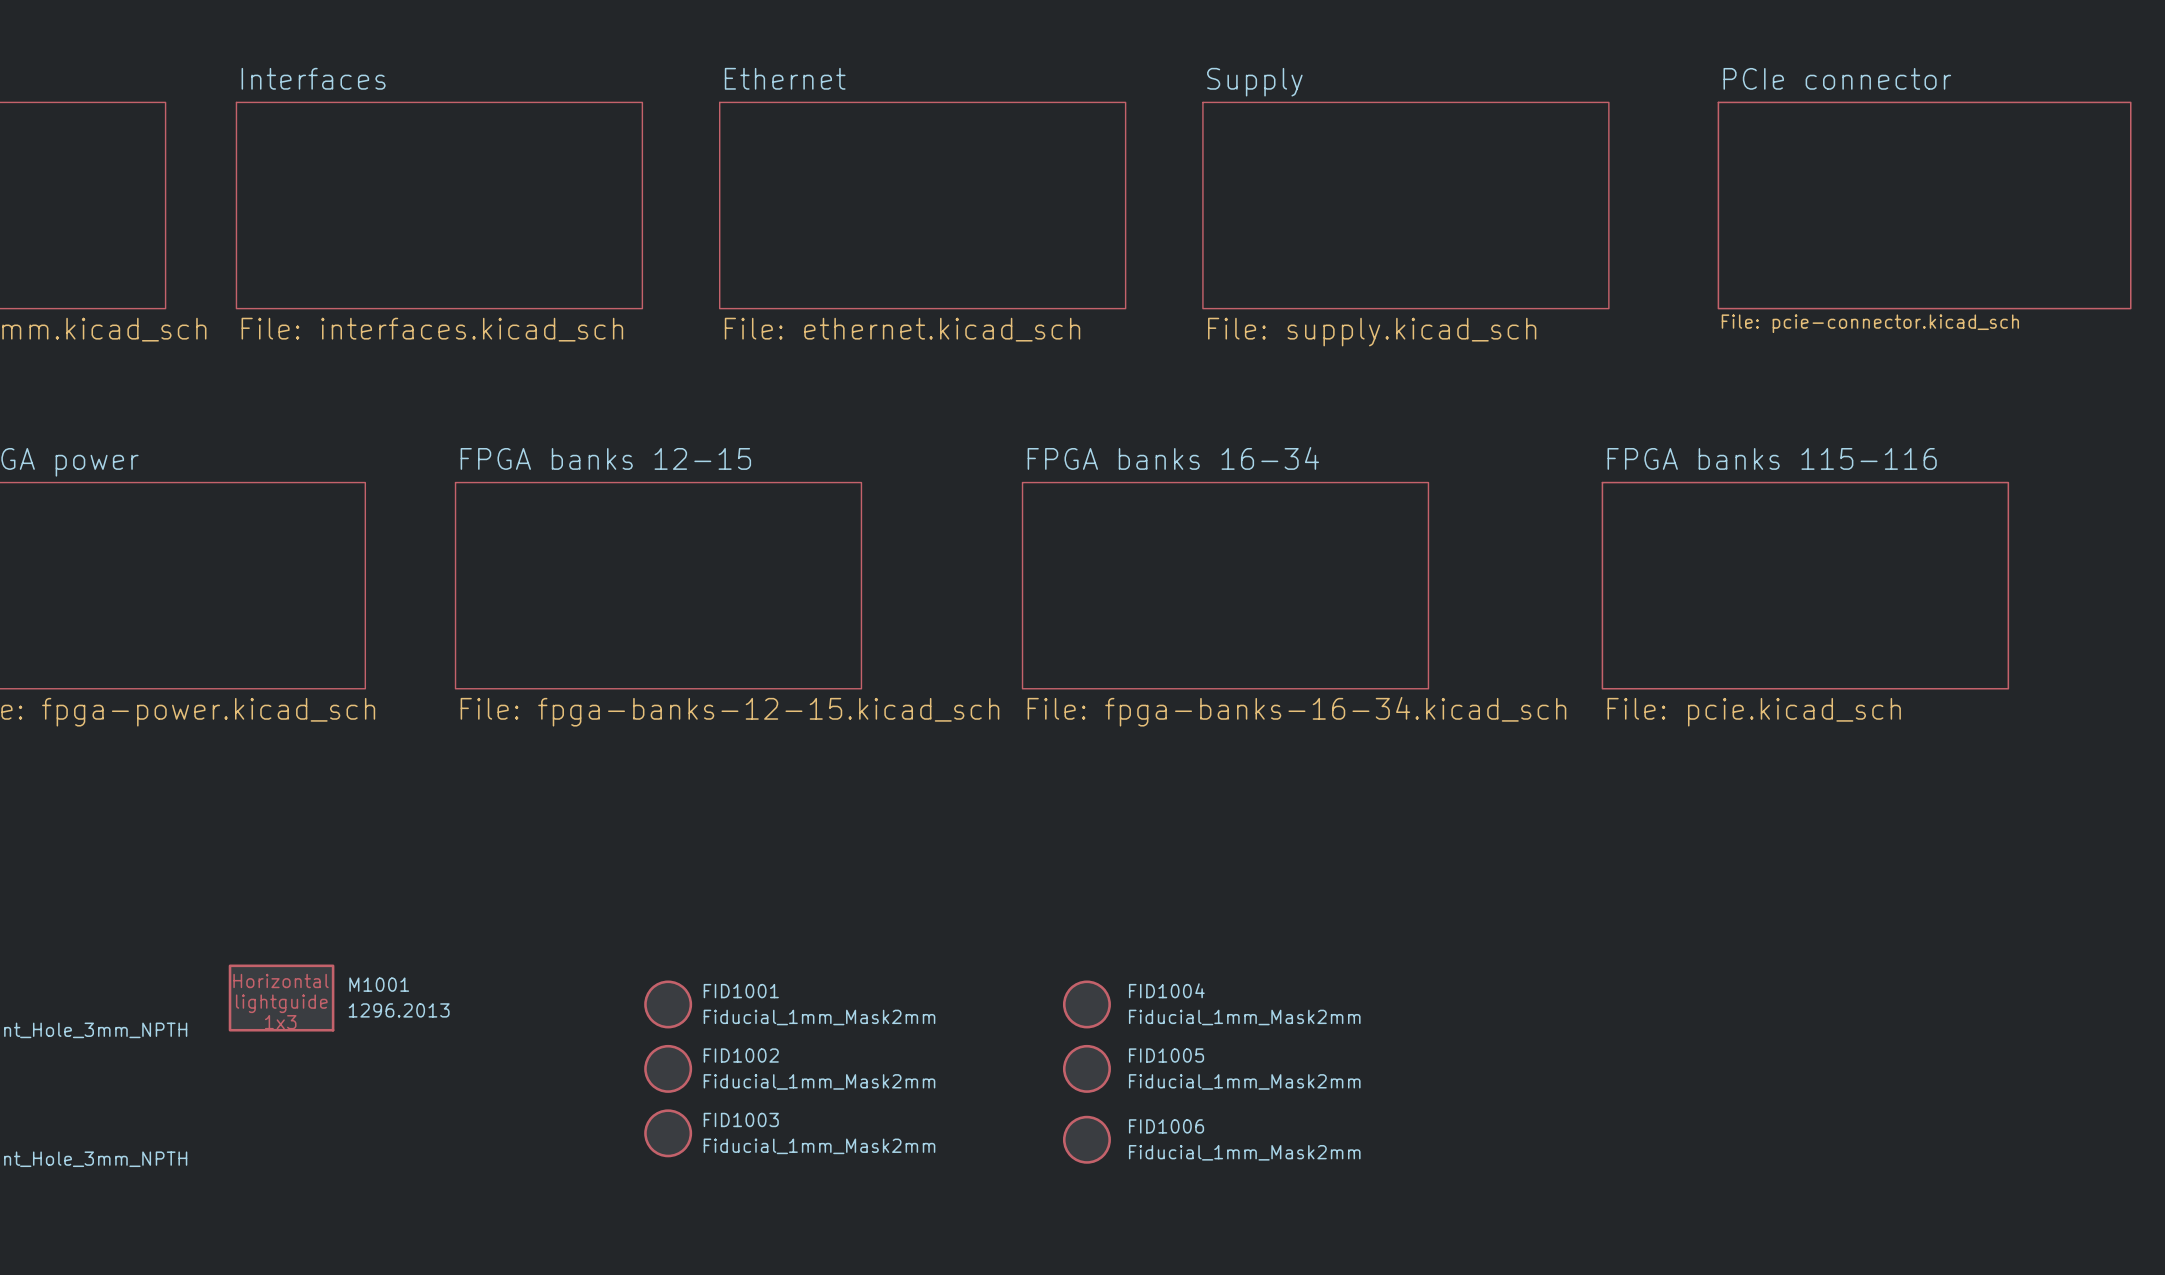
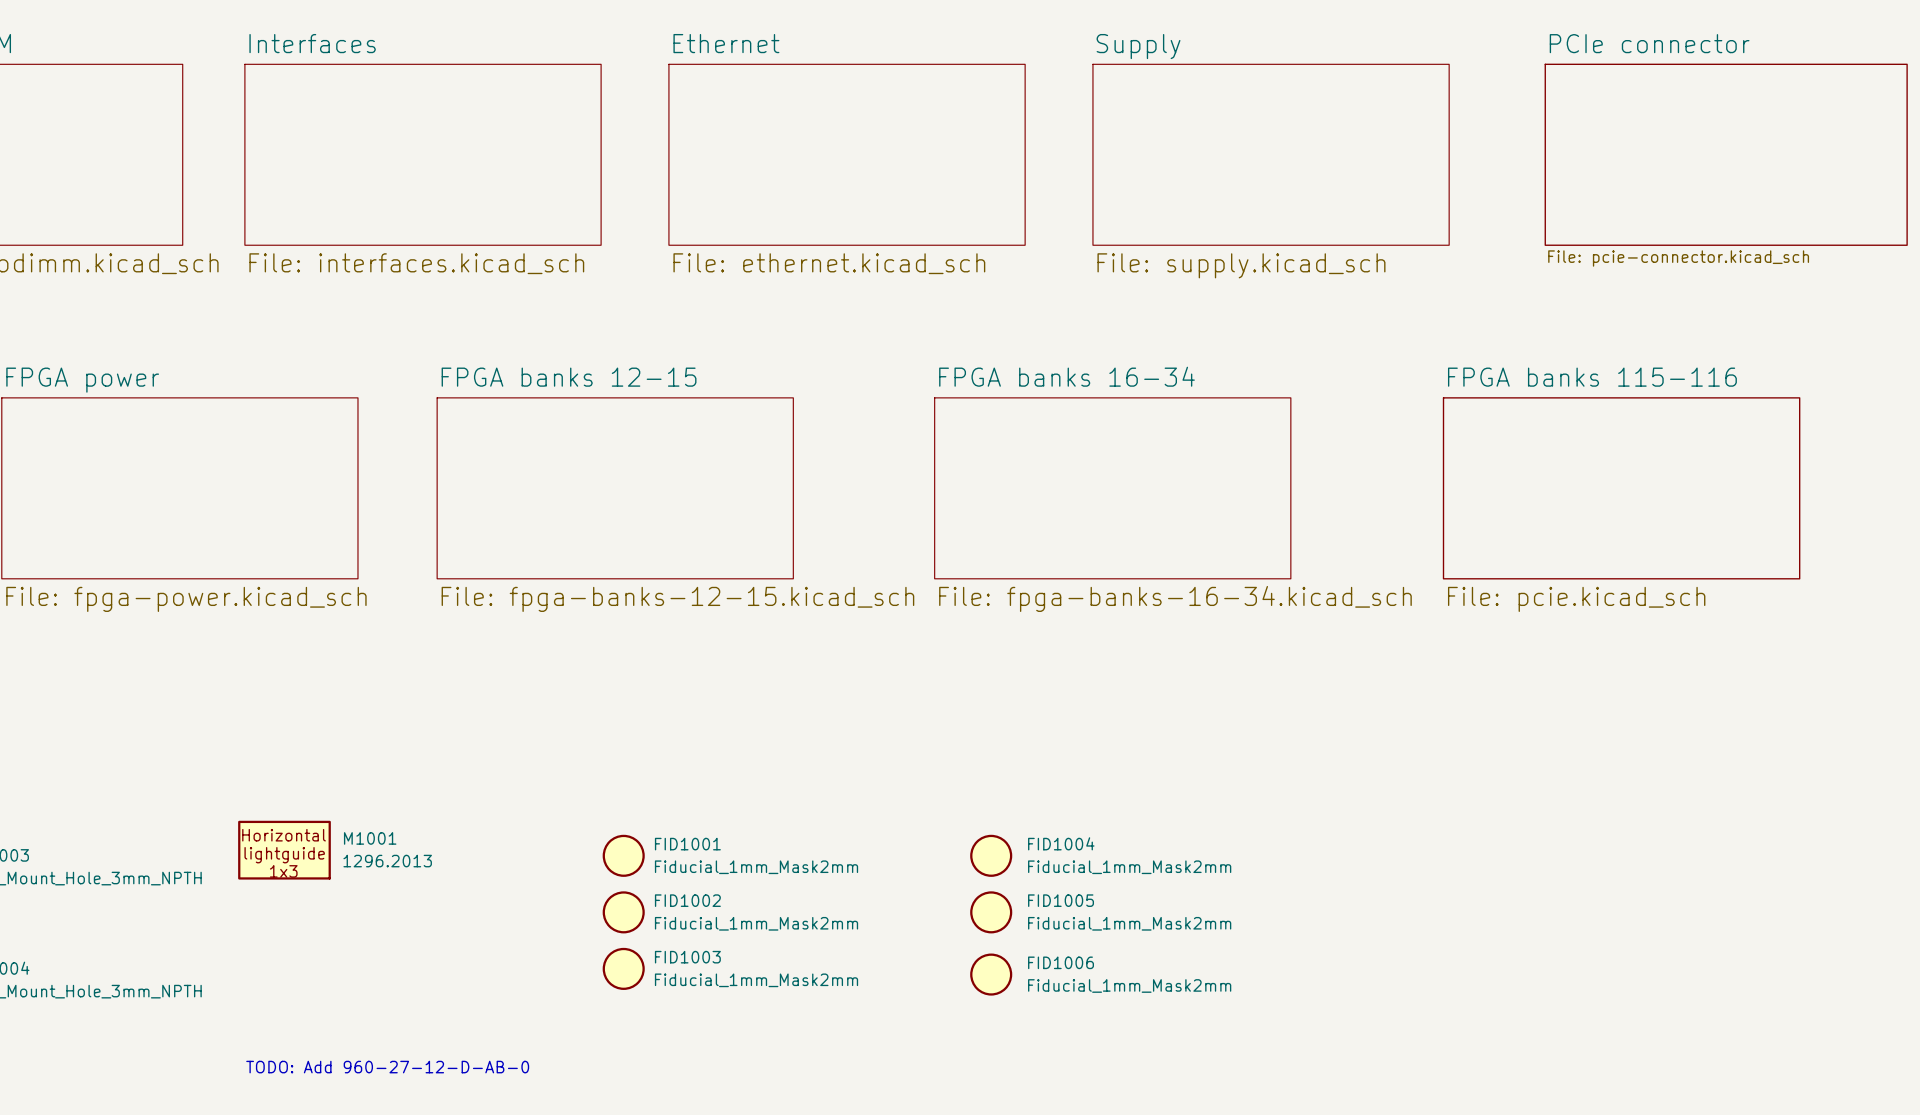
text: none -> TODO: Add 960-27-12-D-AB-0 (387, 1067)

